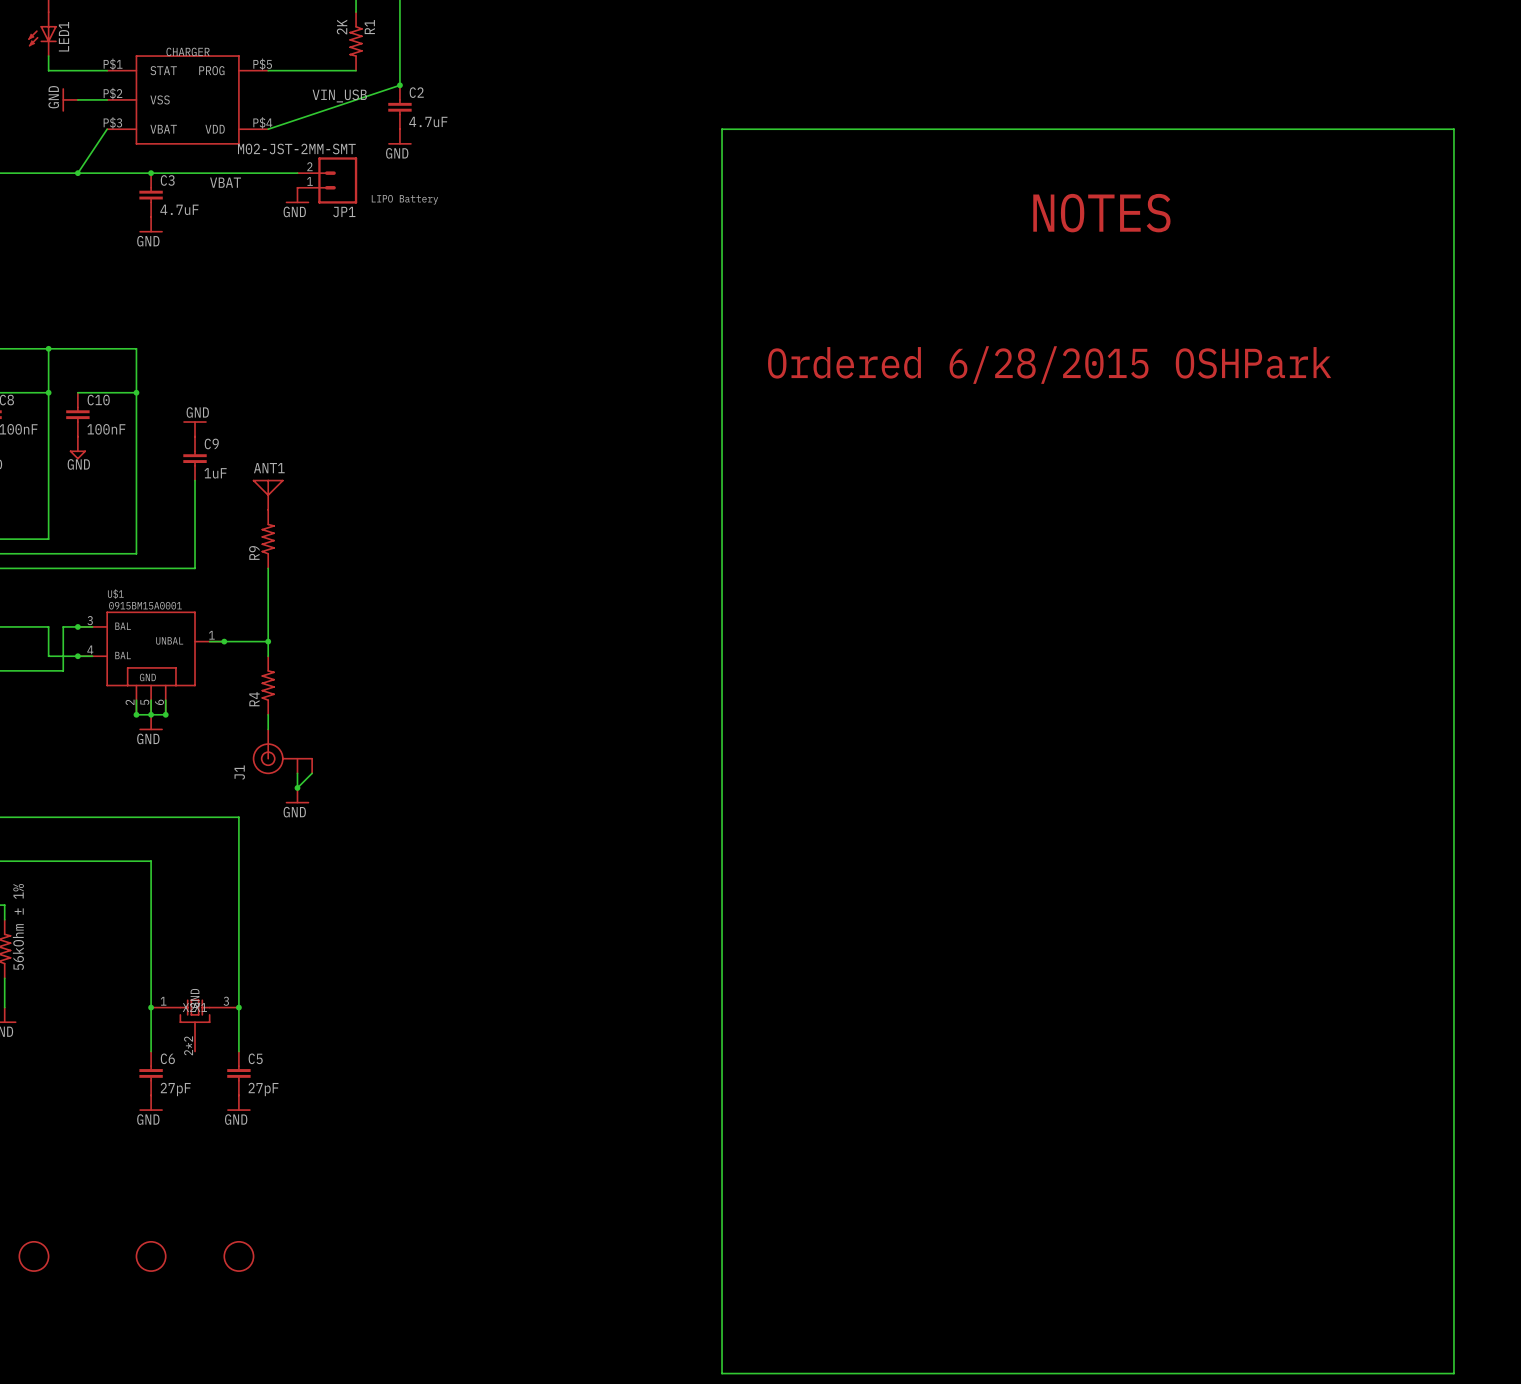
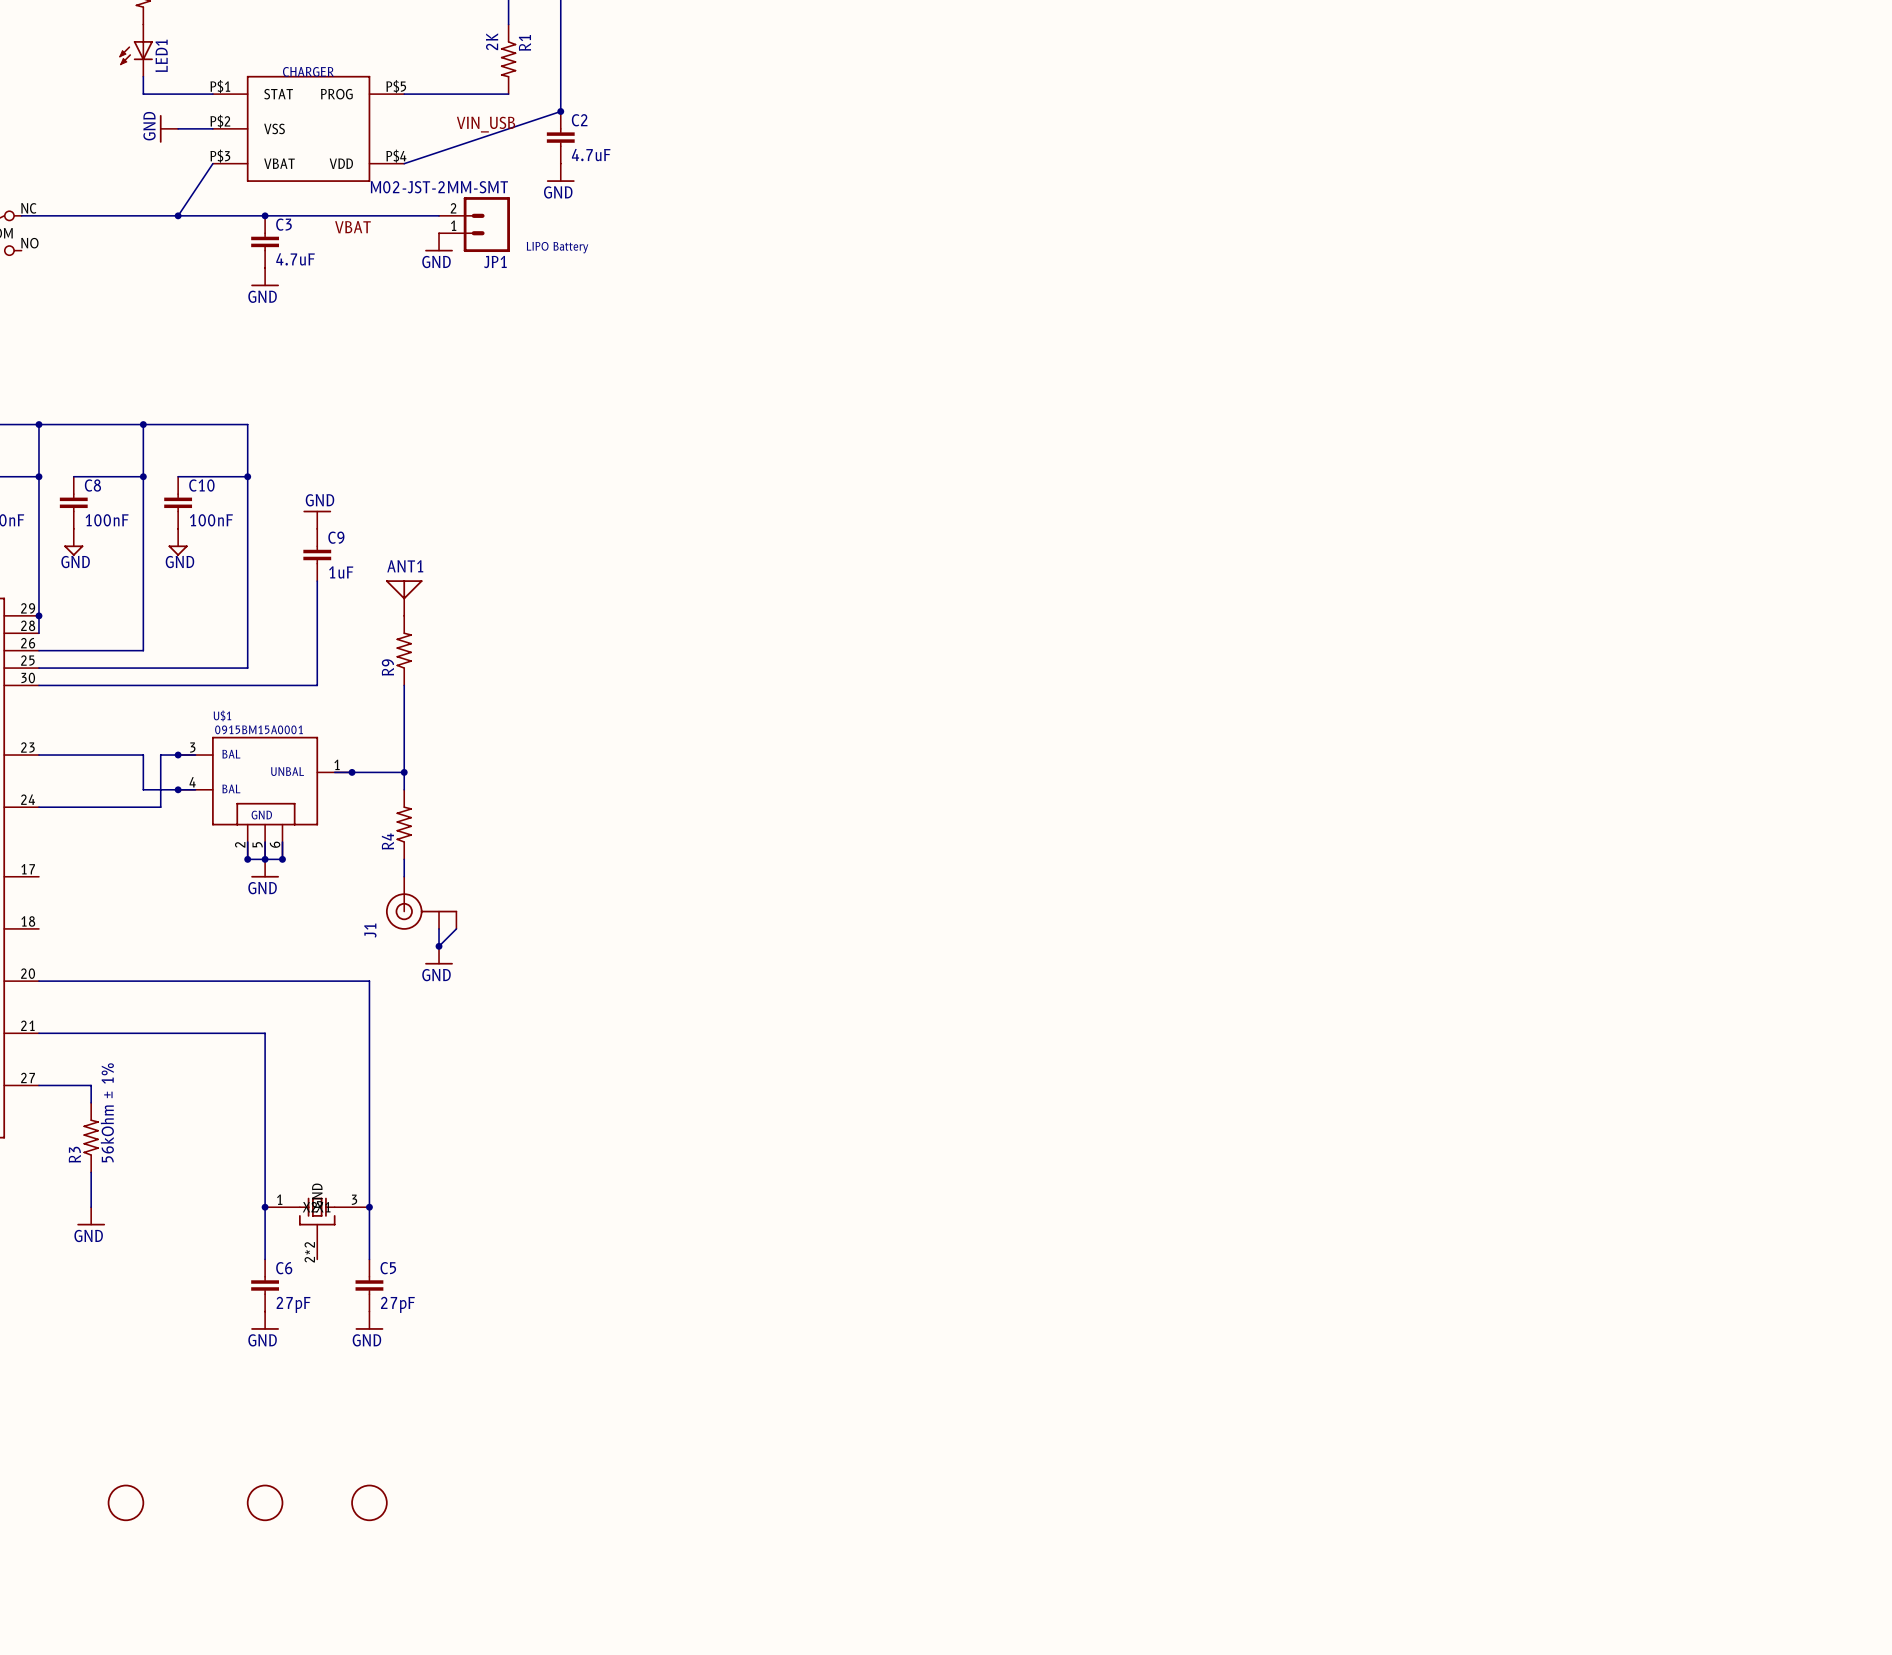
wire: (722, 129) (1453, 129) (1453, 1373) (722, 1373) (722, 129) -> none
text: NOTES (1101, 213) -> none
text: Ordered 6/28/2015 OSHPark (1049, 365) -> none

